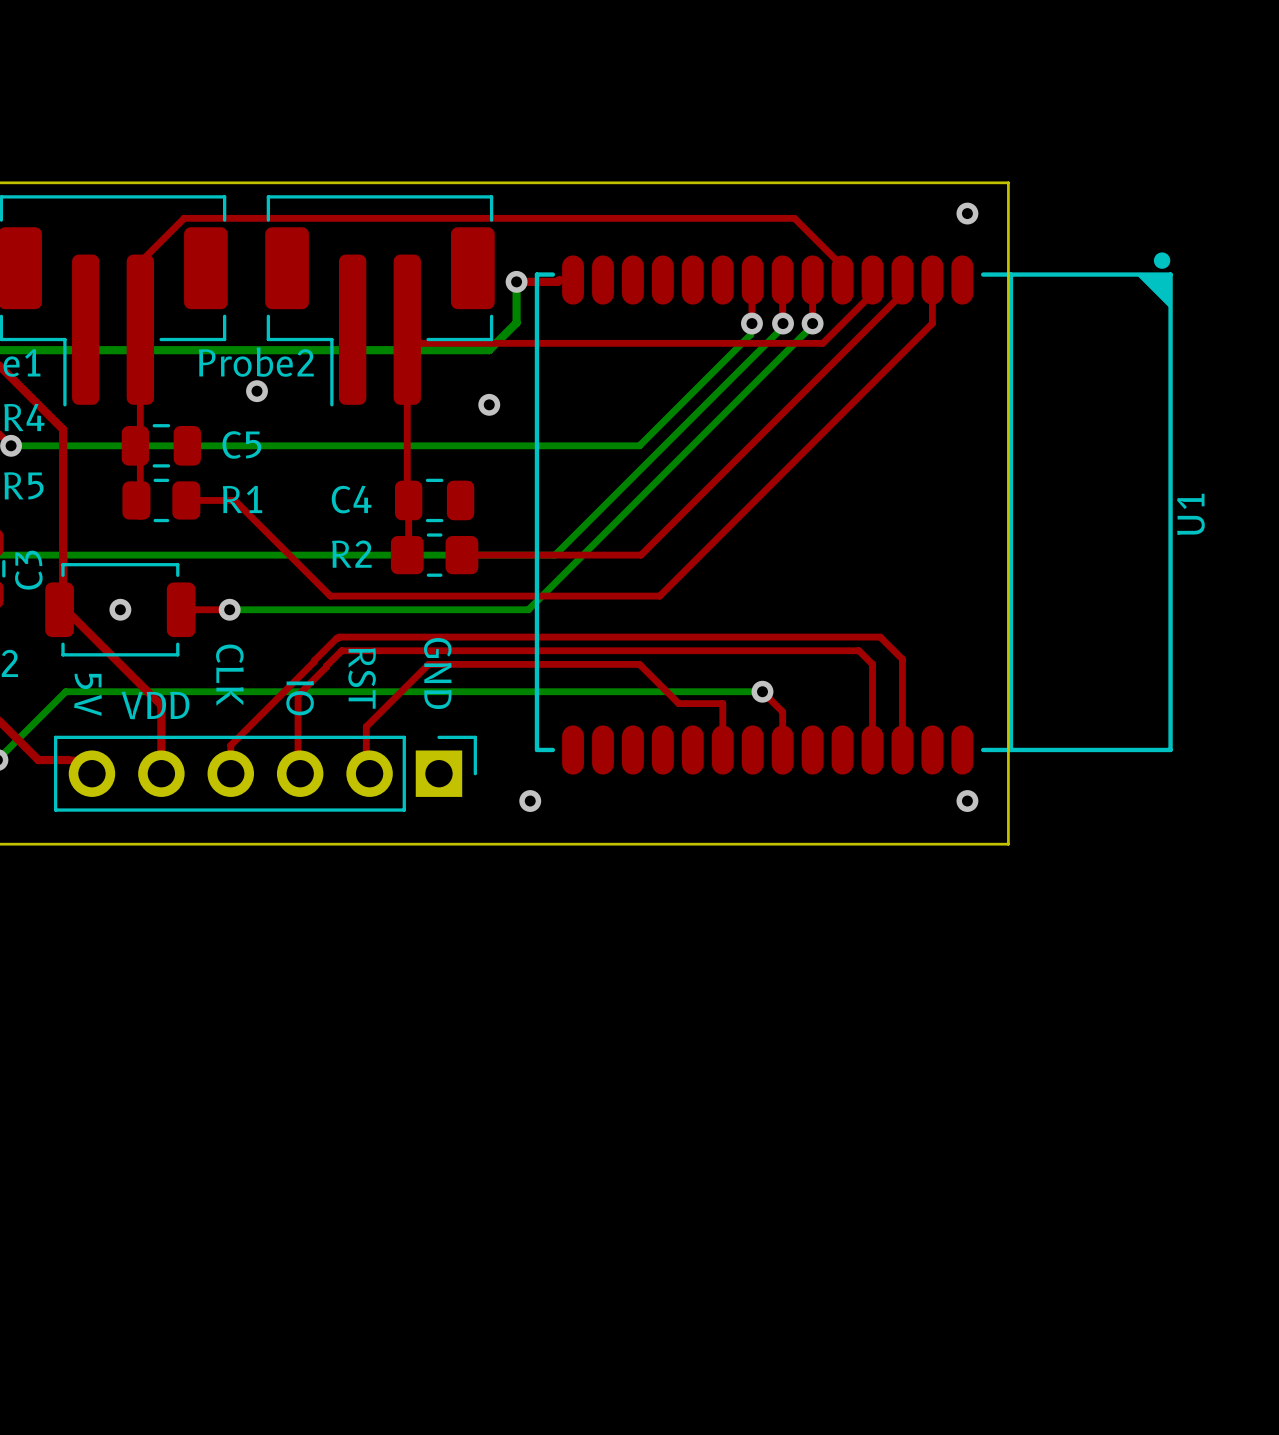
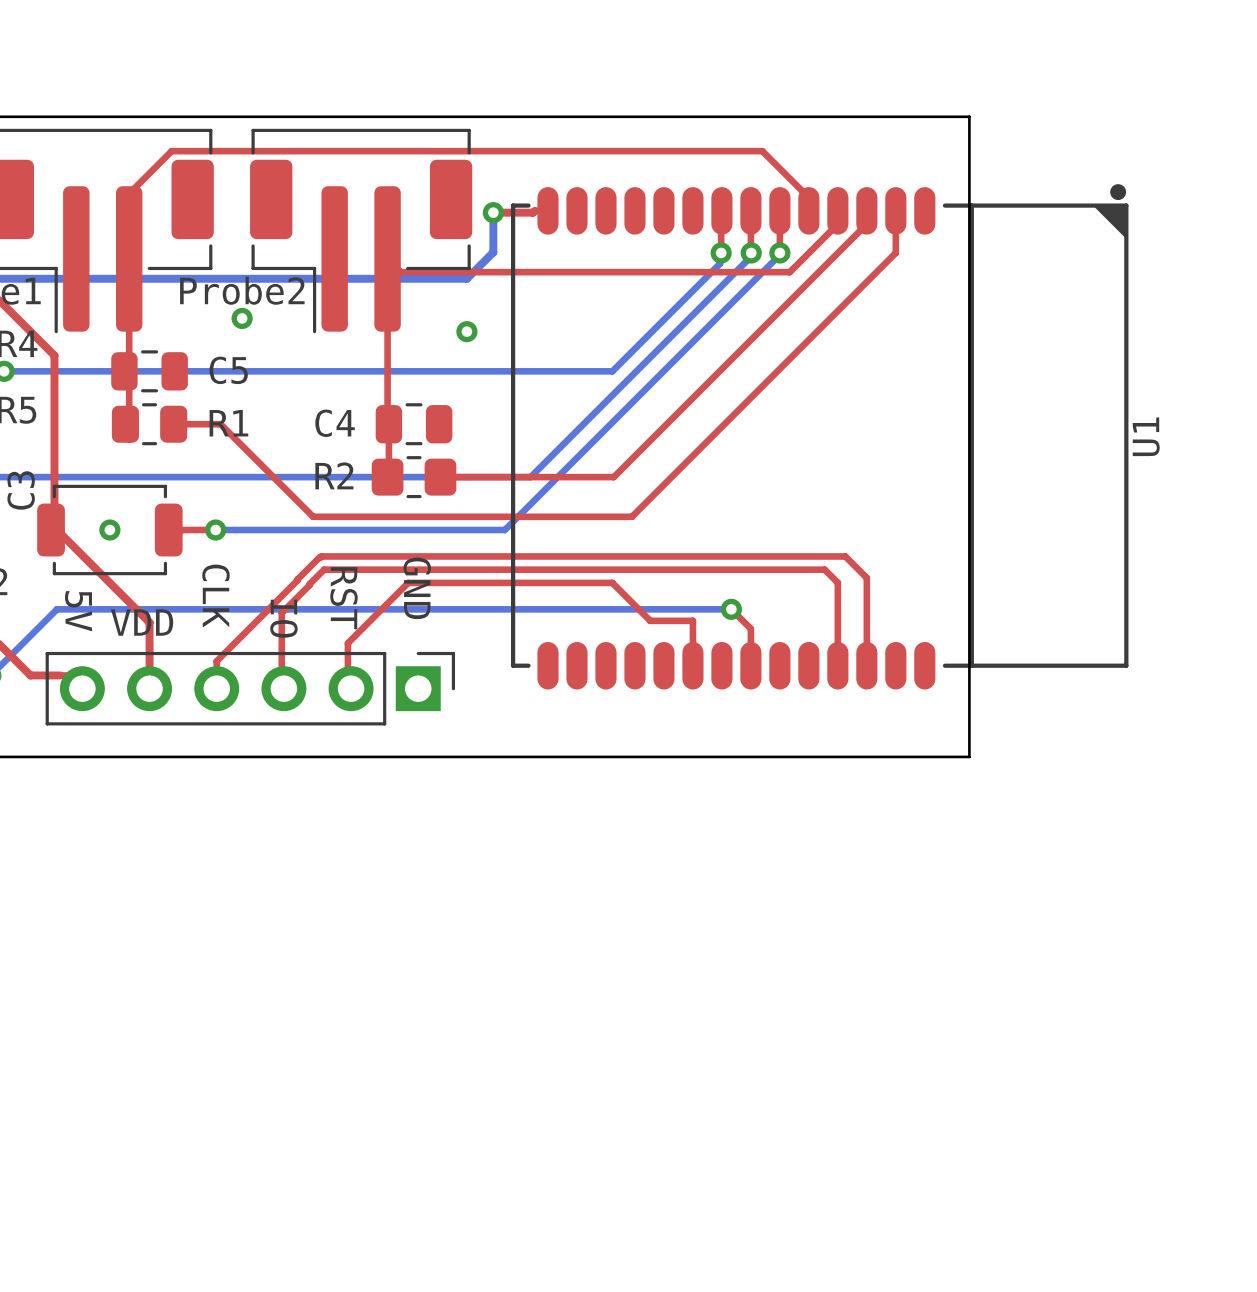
via: (967, 213) -> none
via: (530, 801) -> none
via: (967, 801) -> none

